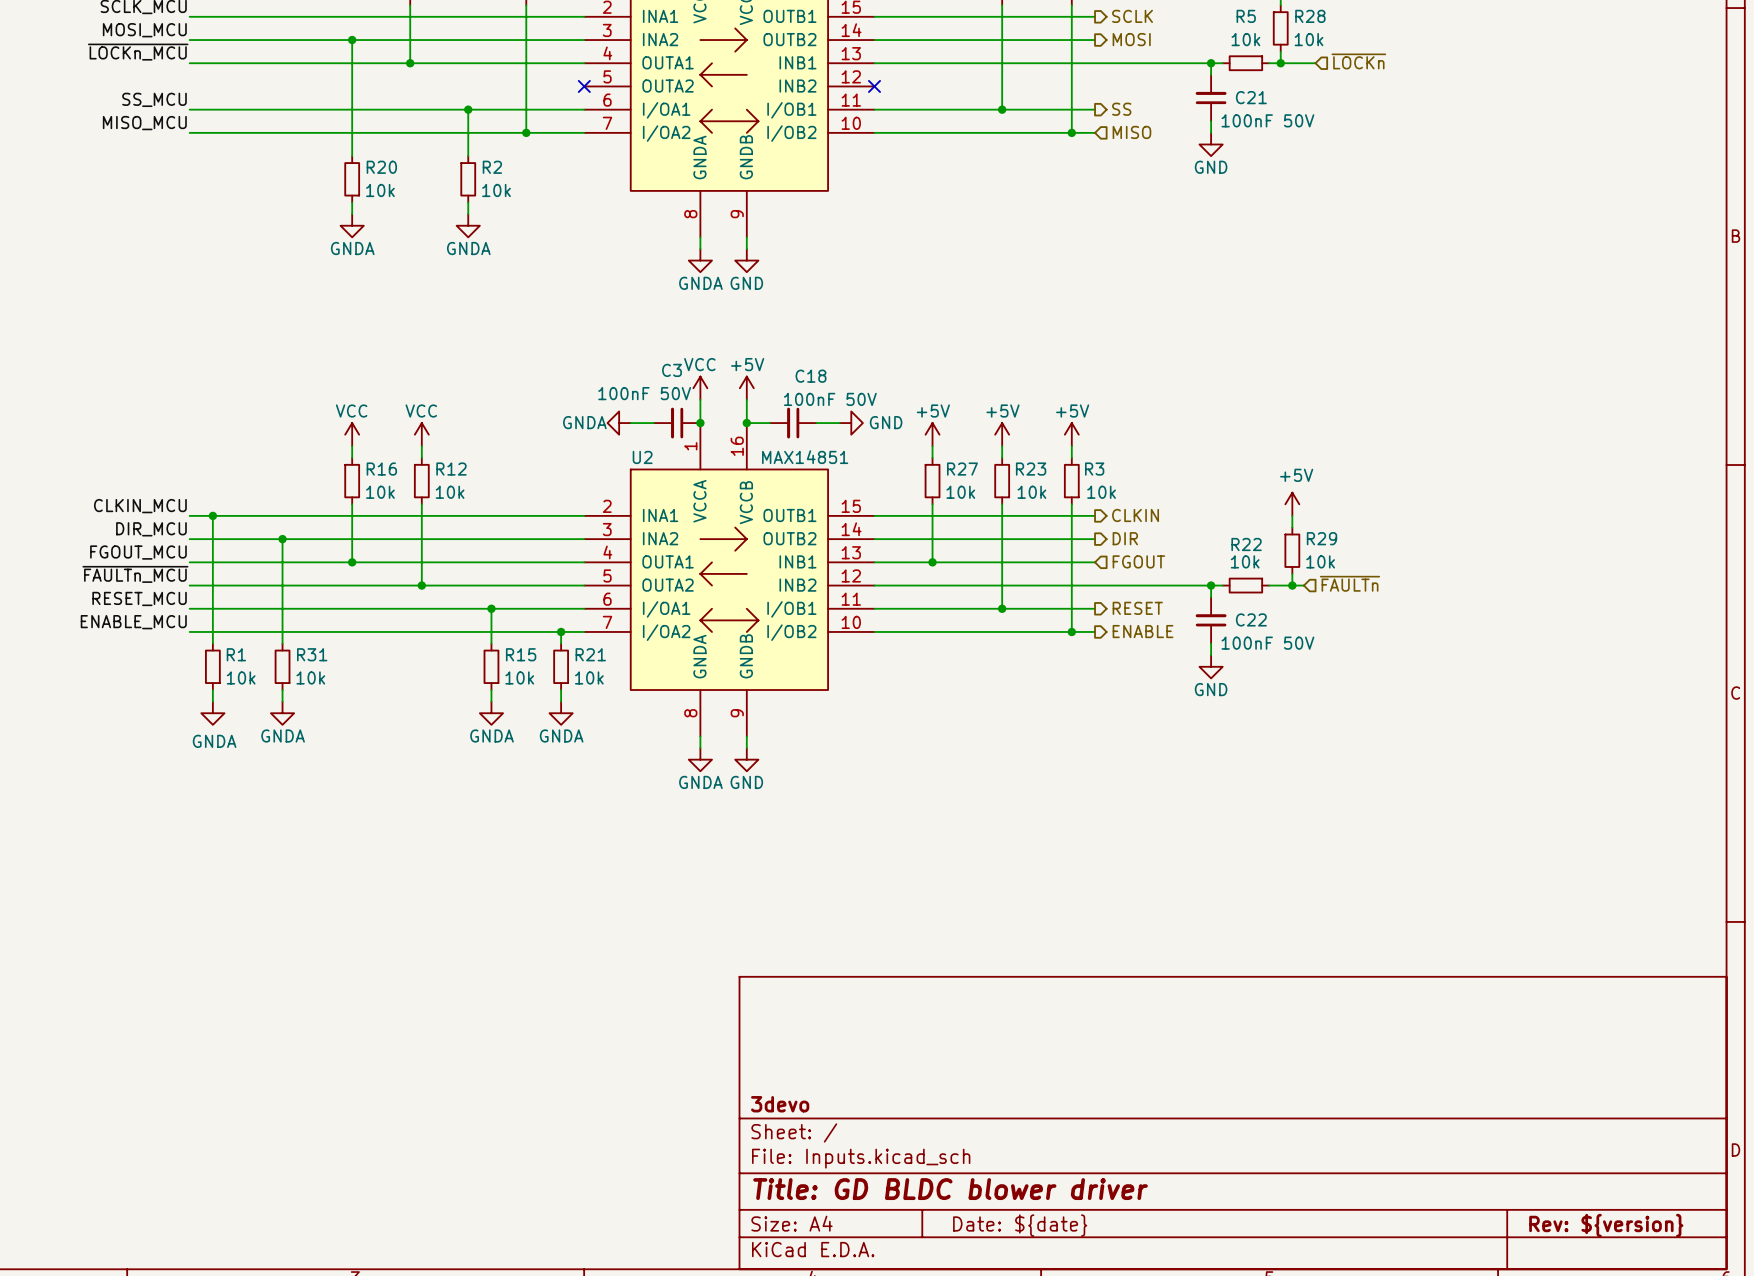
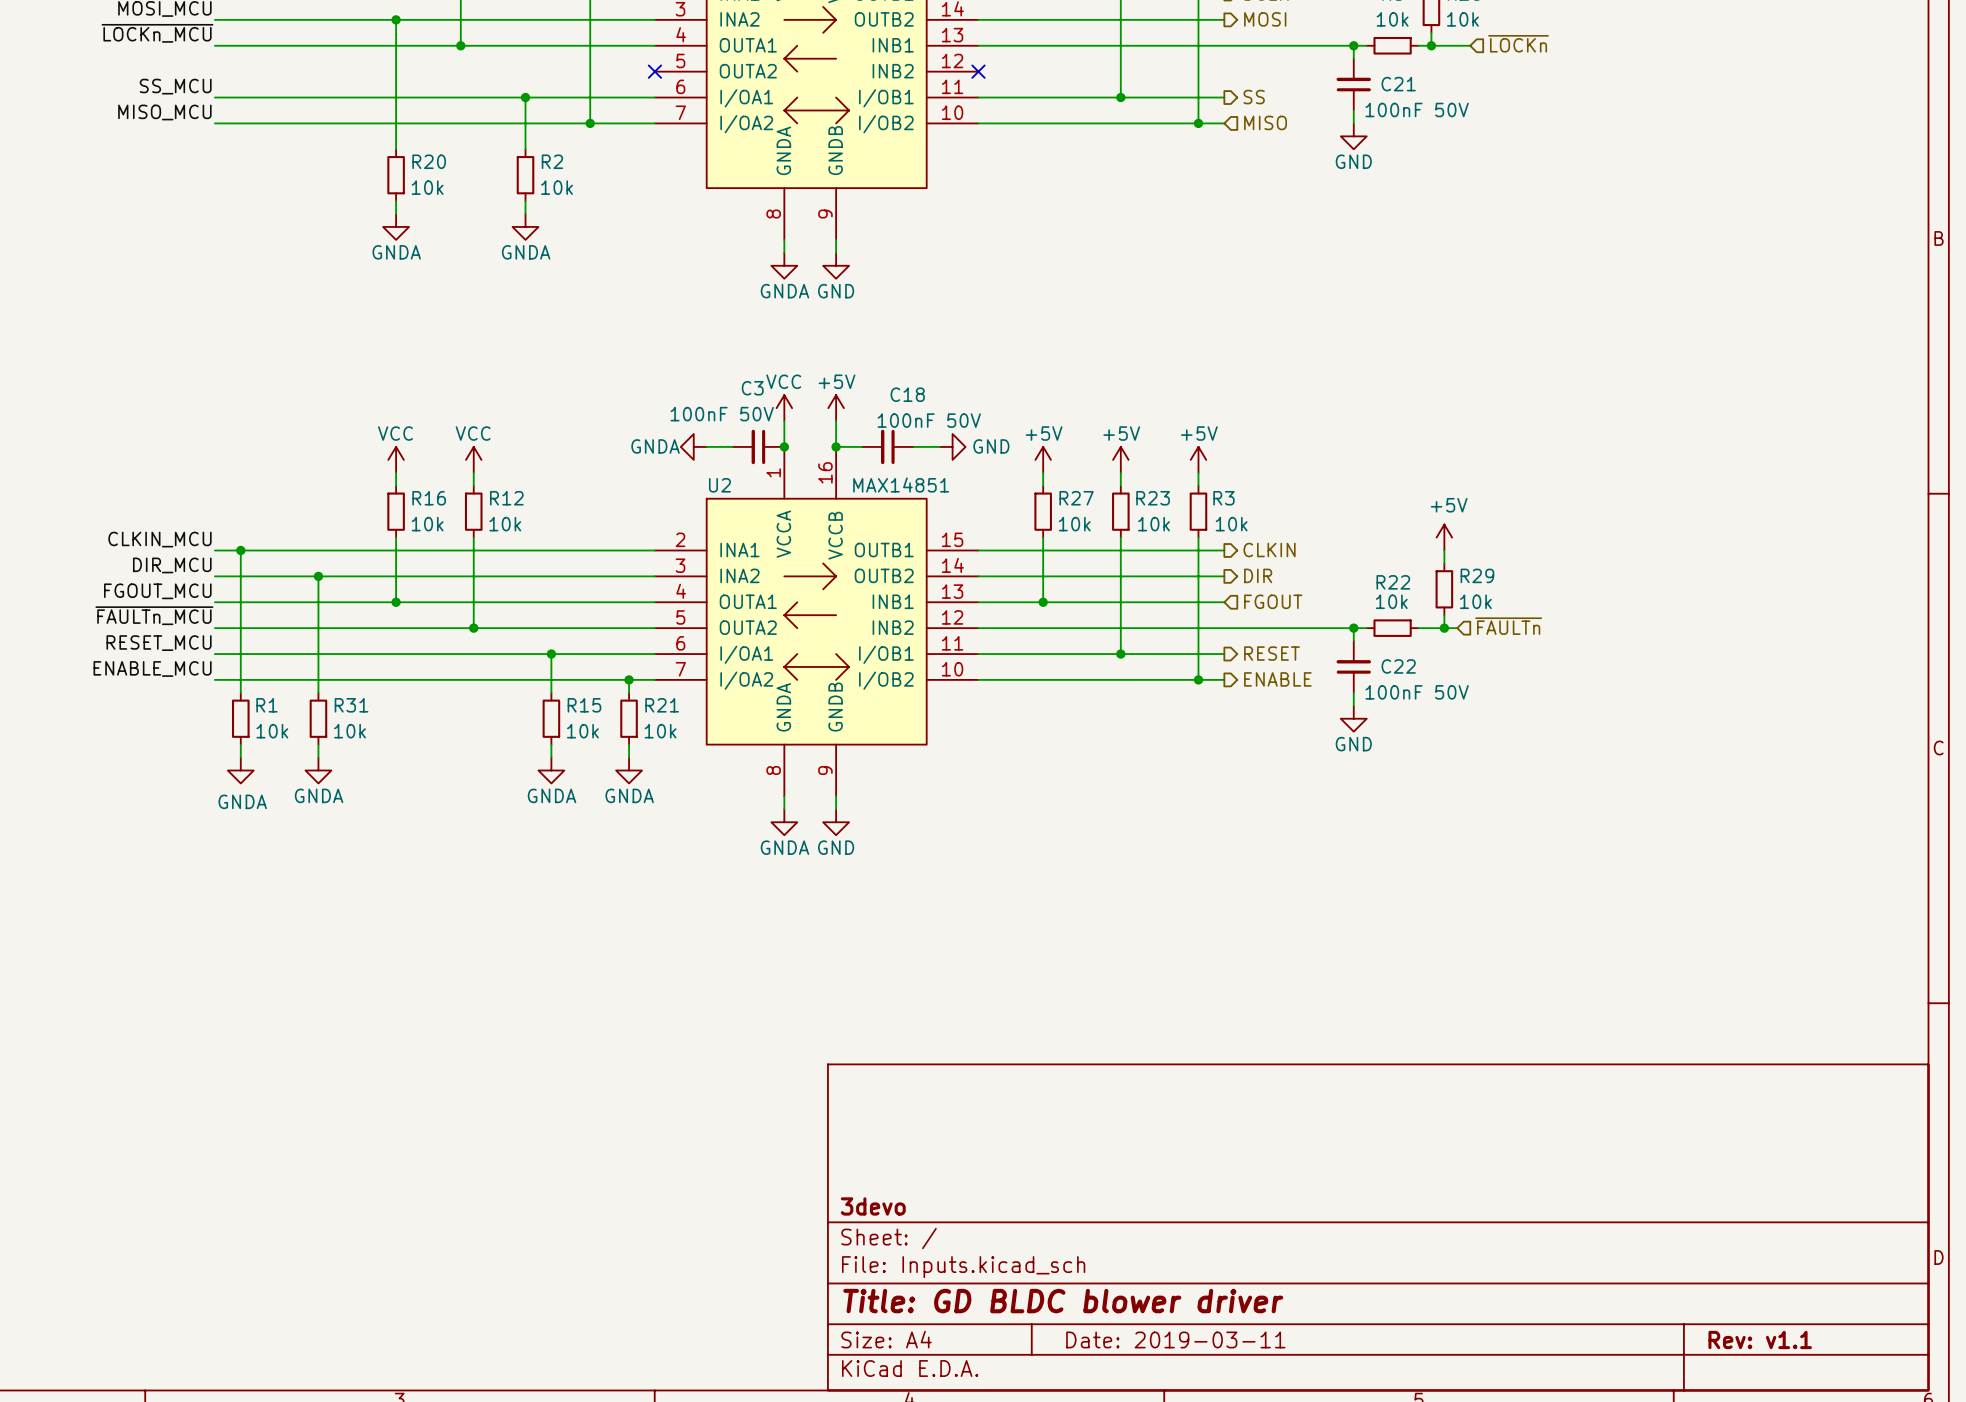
title block: Date: ${date} (1020, 1225) -> Date: 2019-03-11 (1175, 1339)
title block: Rev: ${version} (1606, 1225) -> Rev: v1.1 (1760, 1339)

